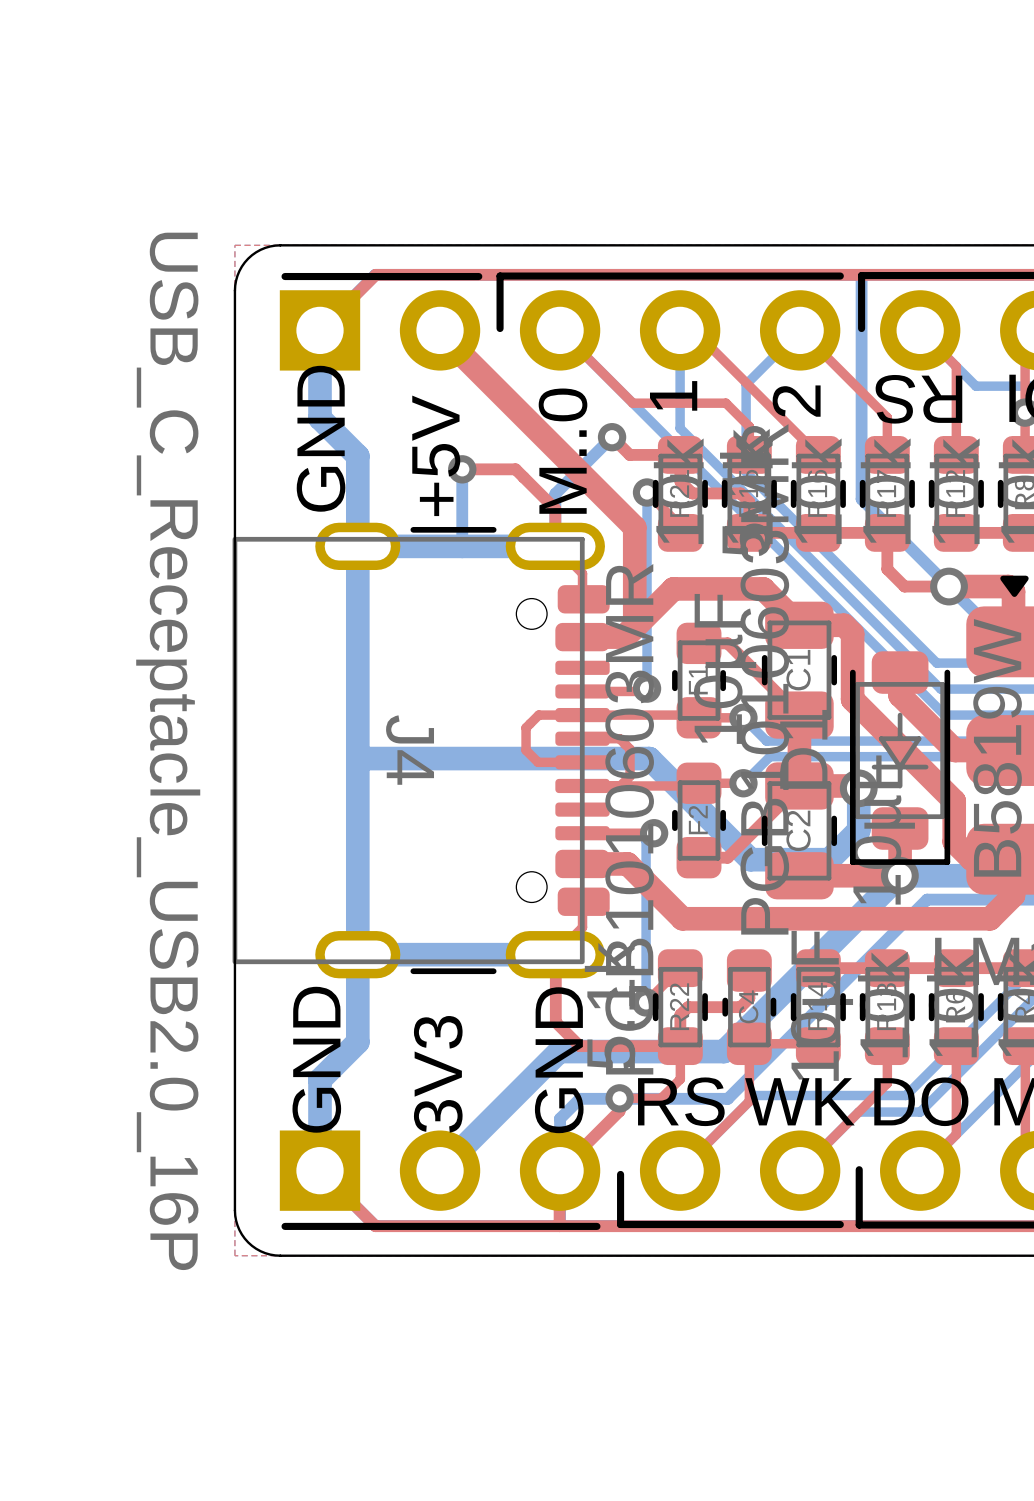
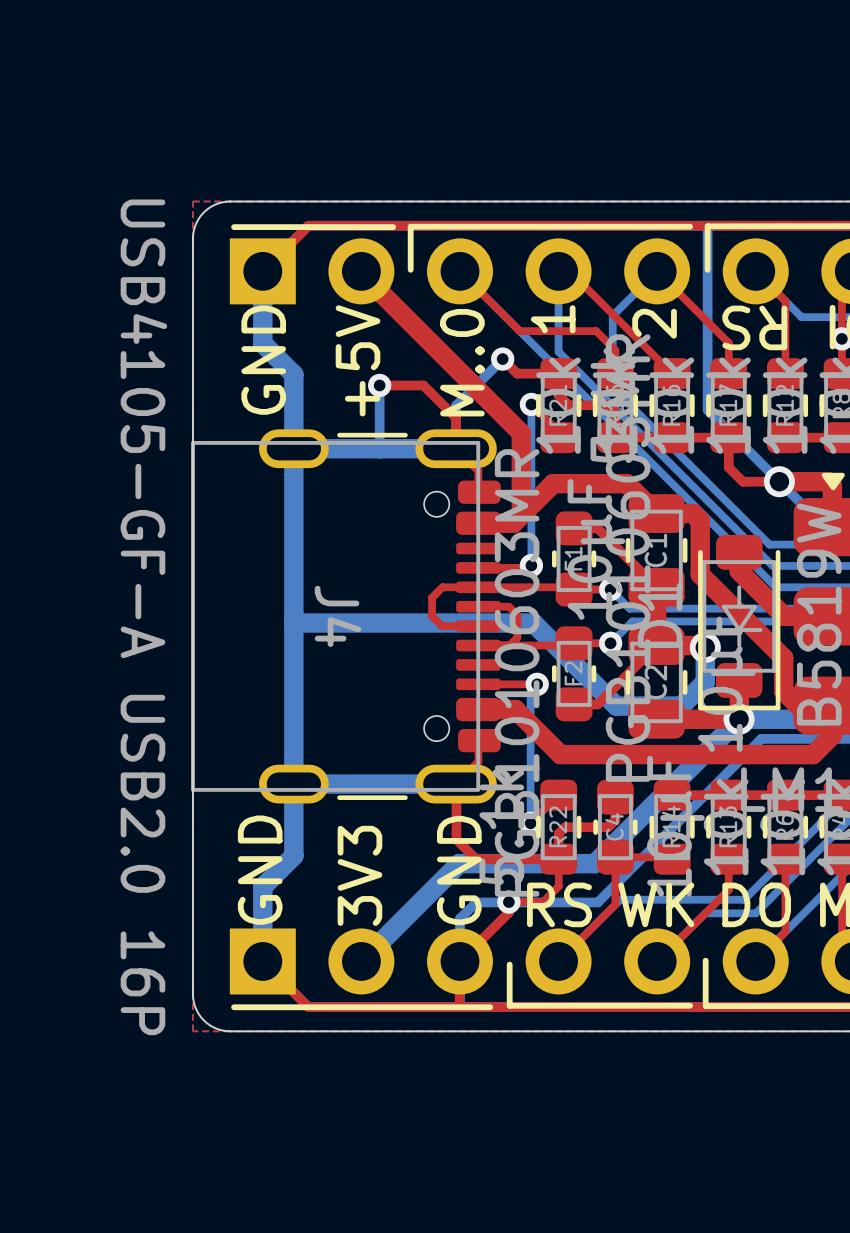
J4 value: USB_C_Receptacle_USB2.0_16P (168, 751) -> USB4105-GF-A USB2.0 16P (143, 617)

